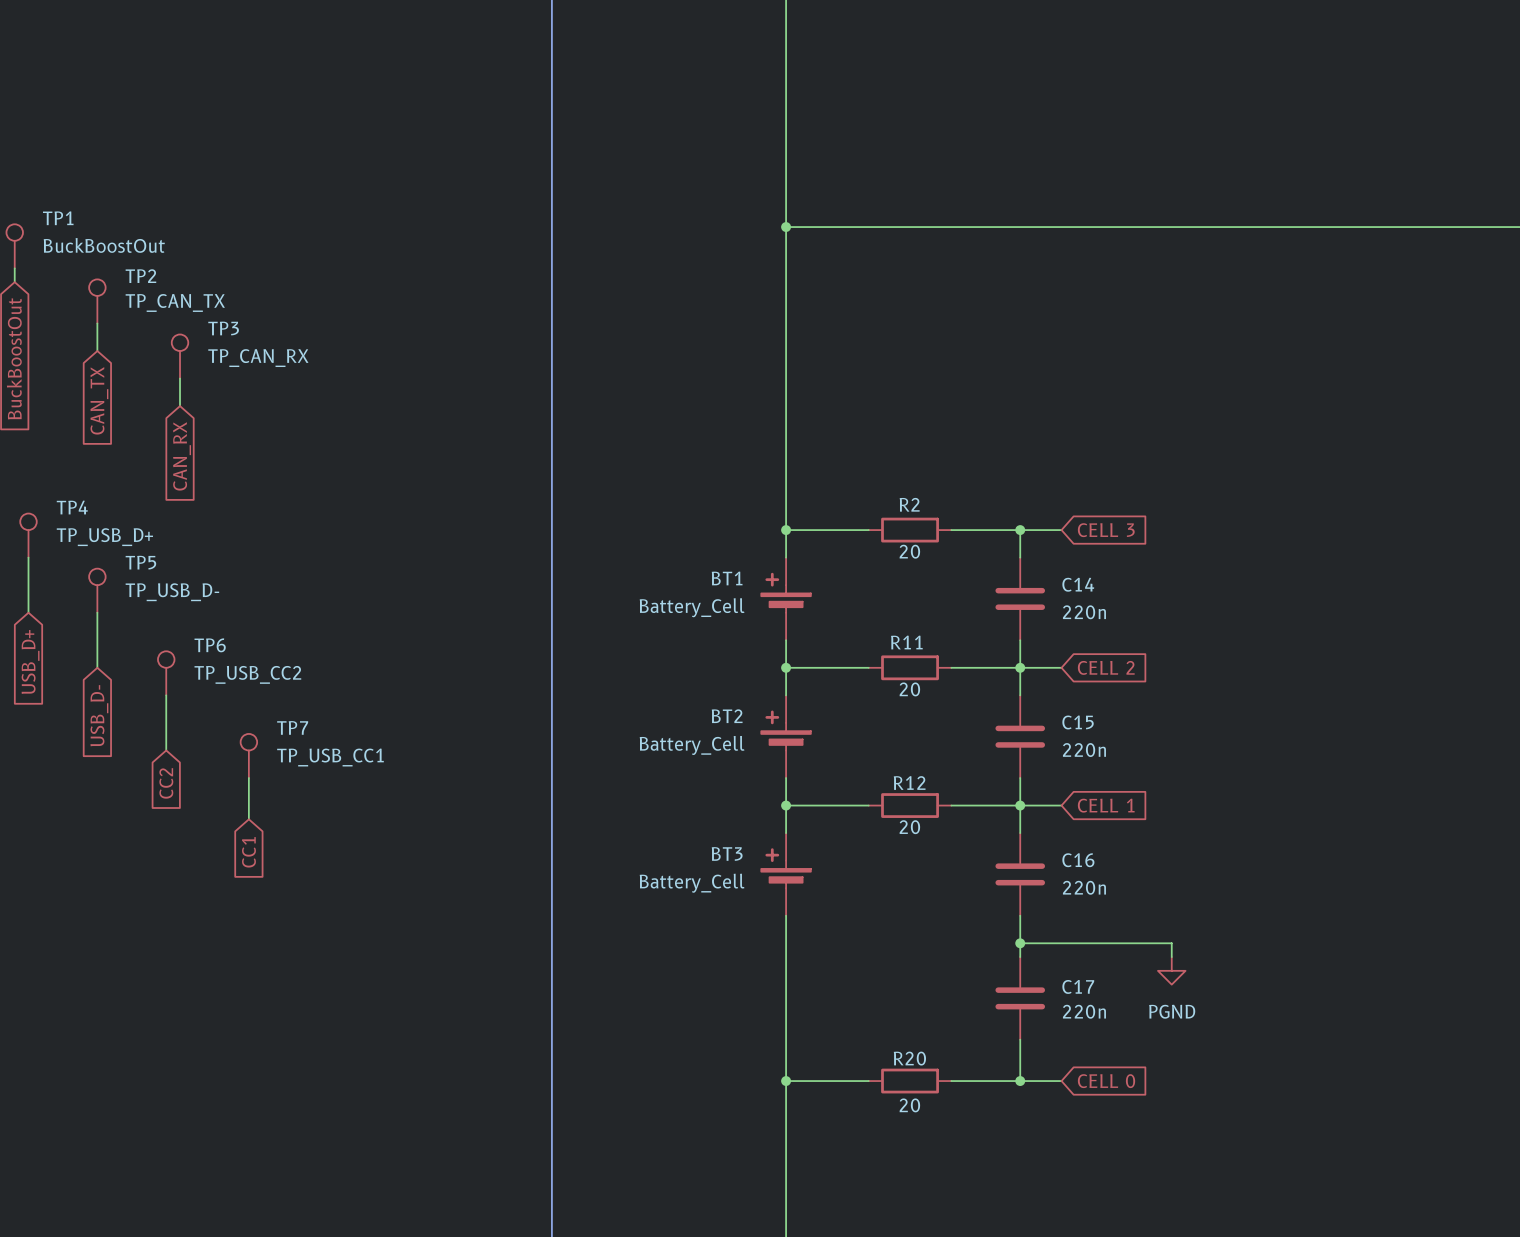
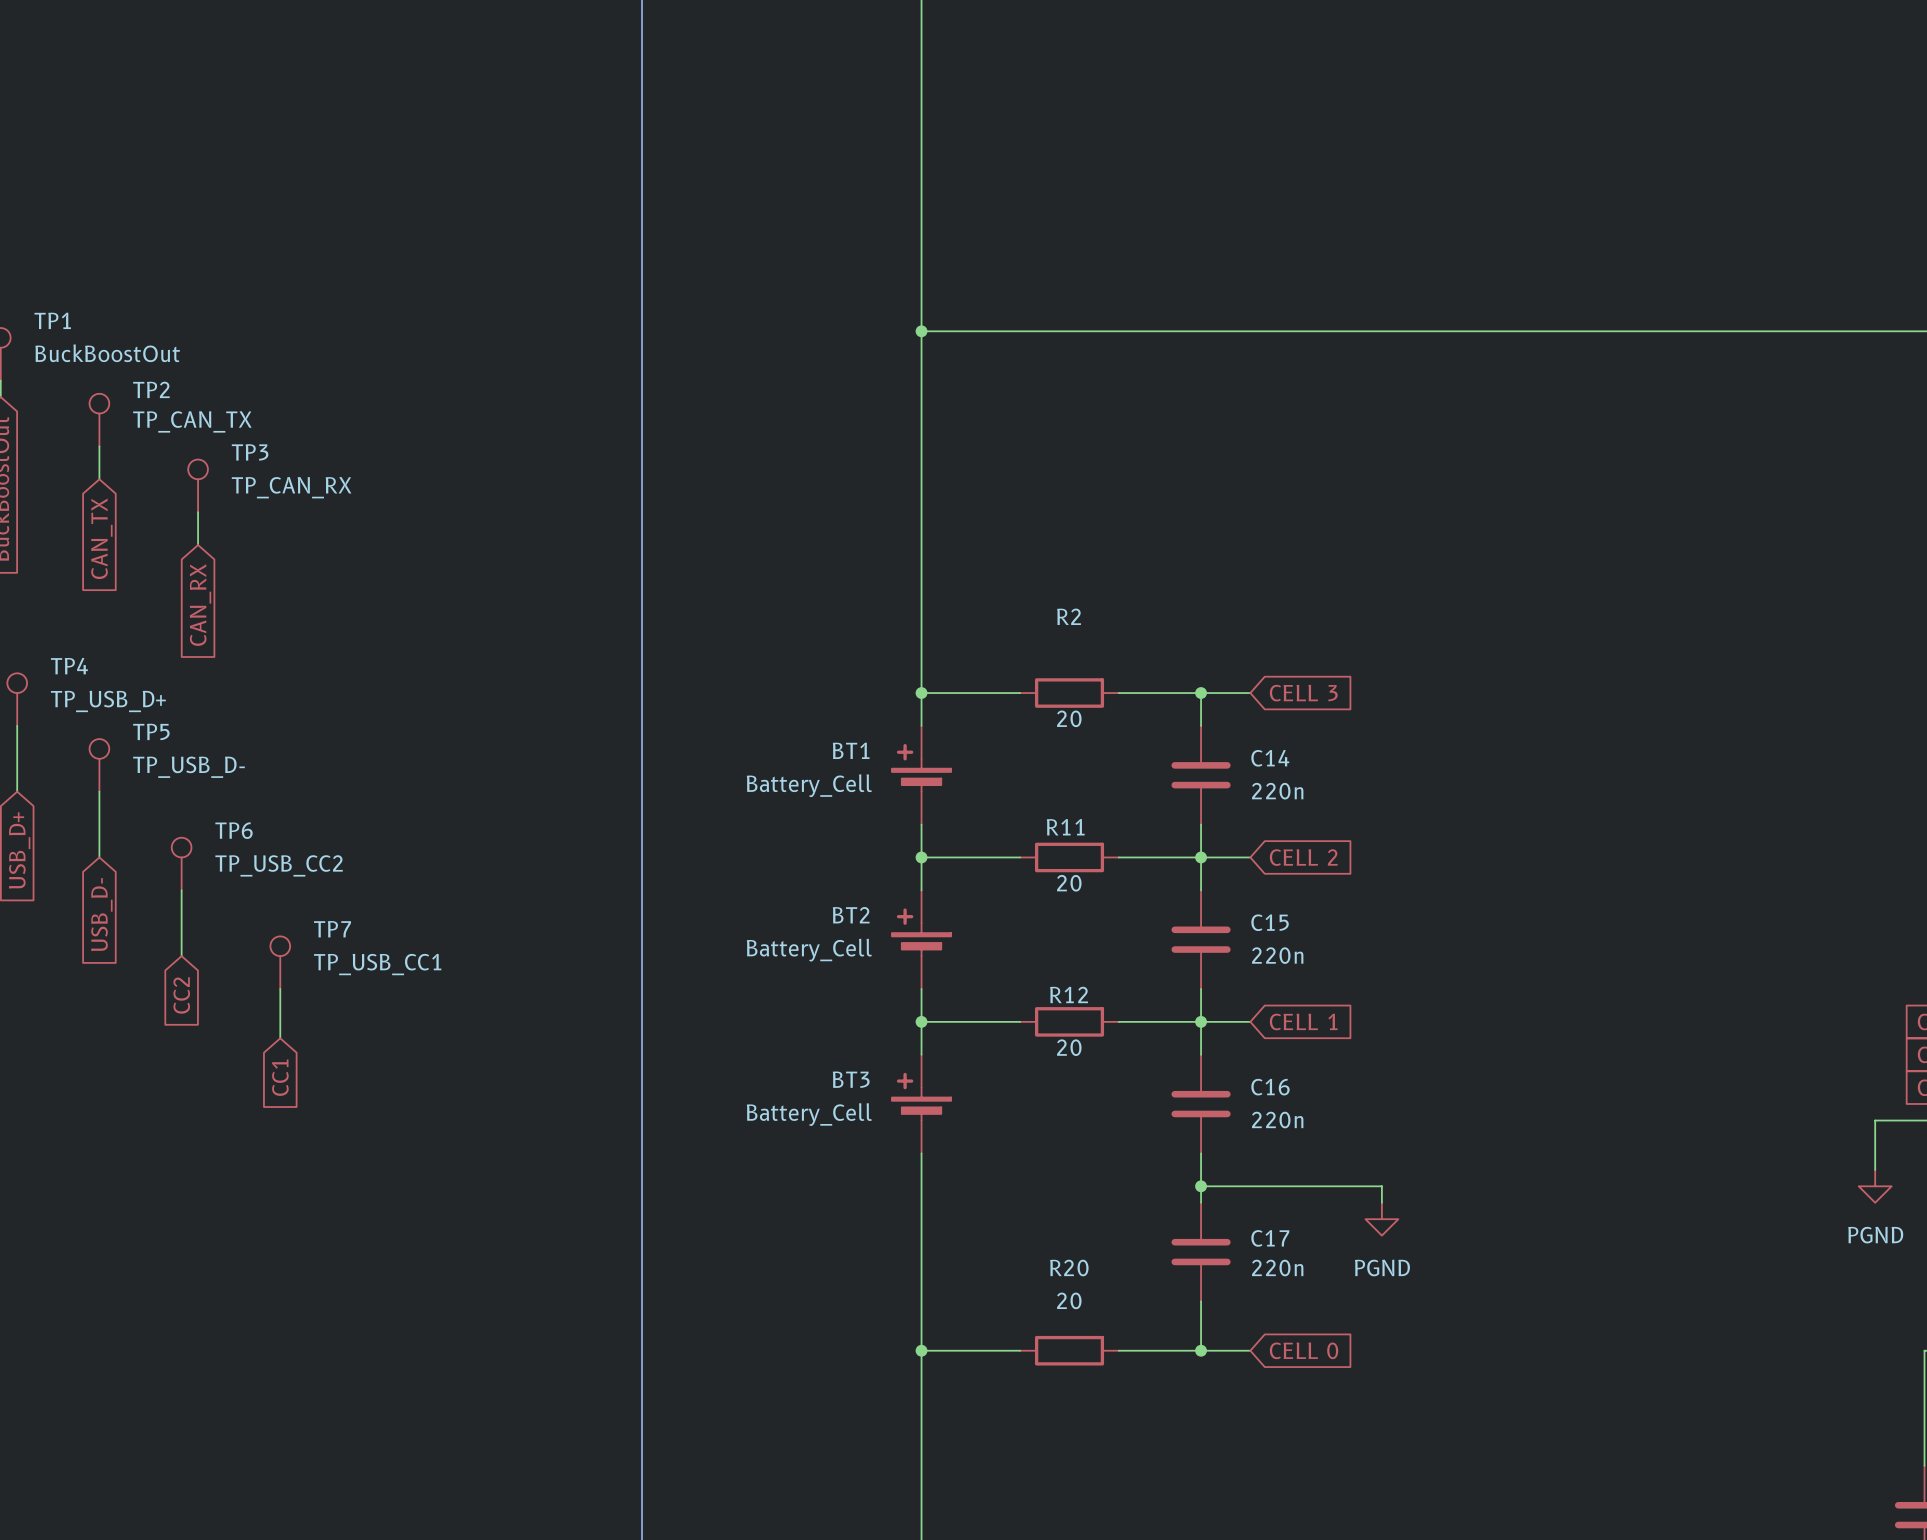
R2 name position: R2 (909, 504) -> R2 (1069, 616)
R20 name position: R20 (909, 1058) -> R20 (1069, 1268)
R20 value position: 20 (909, 1105) -> 20 (1069, 1300)

